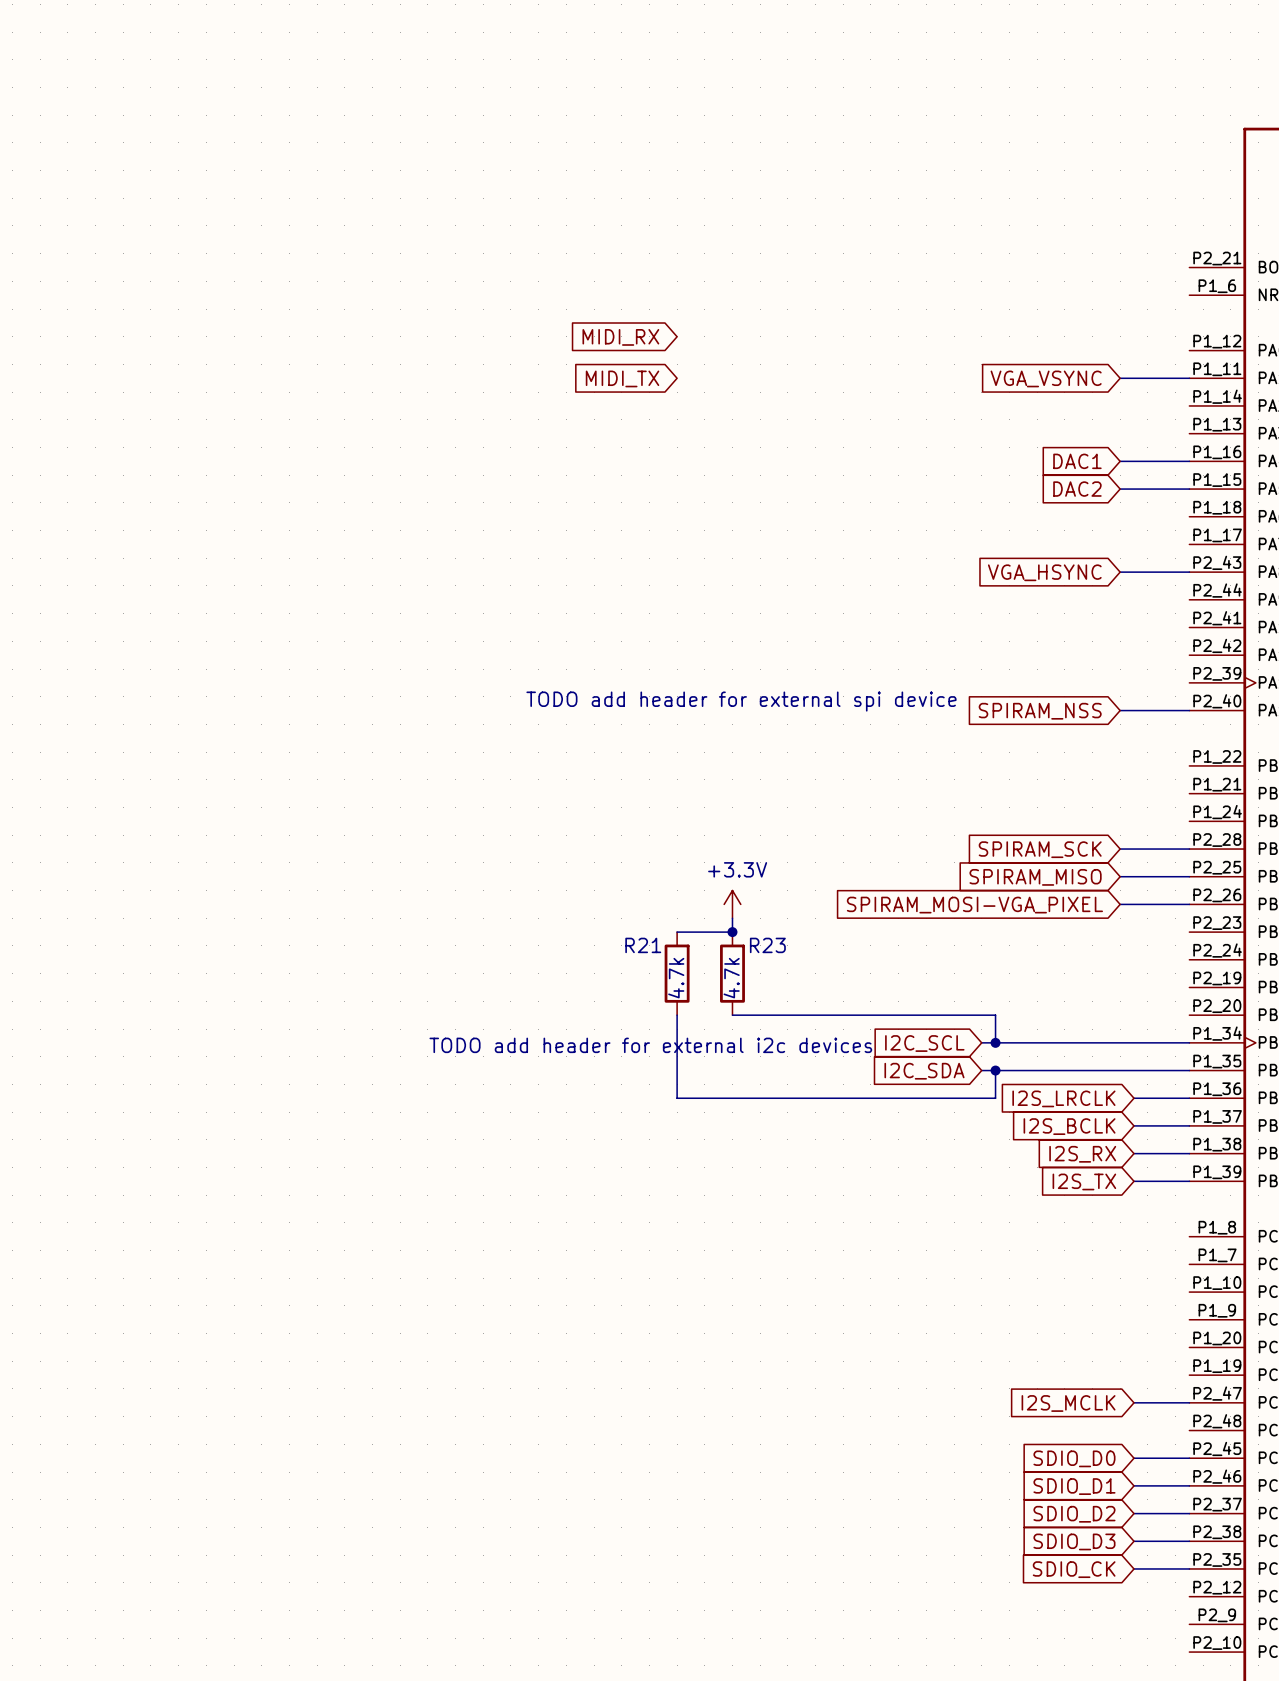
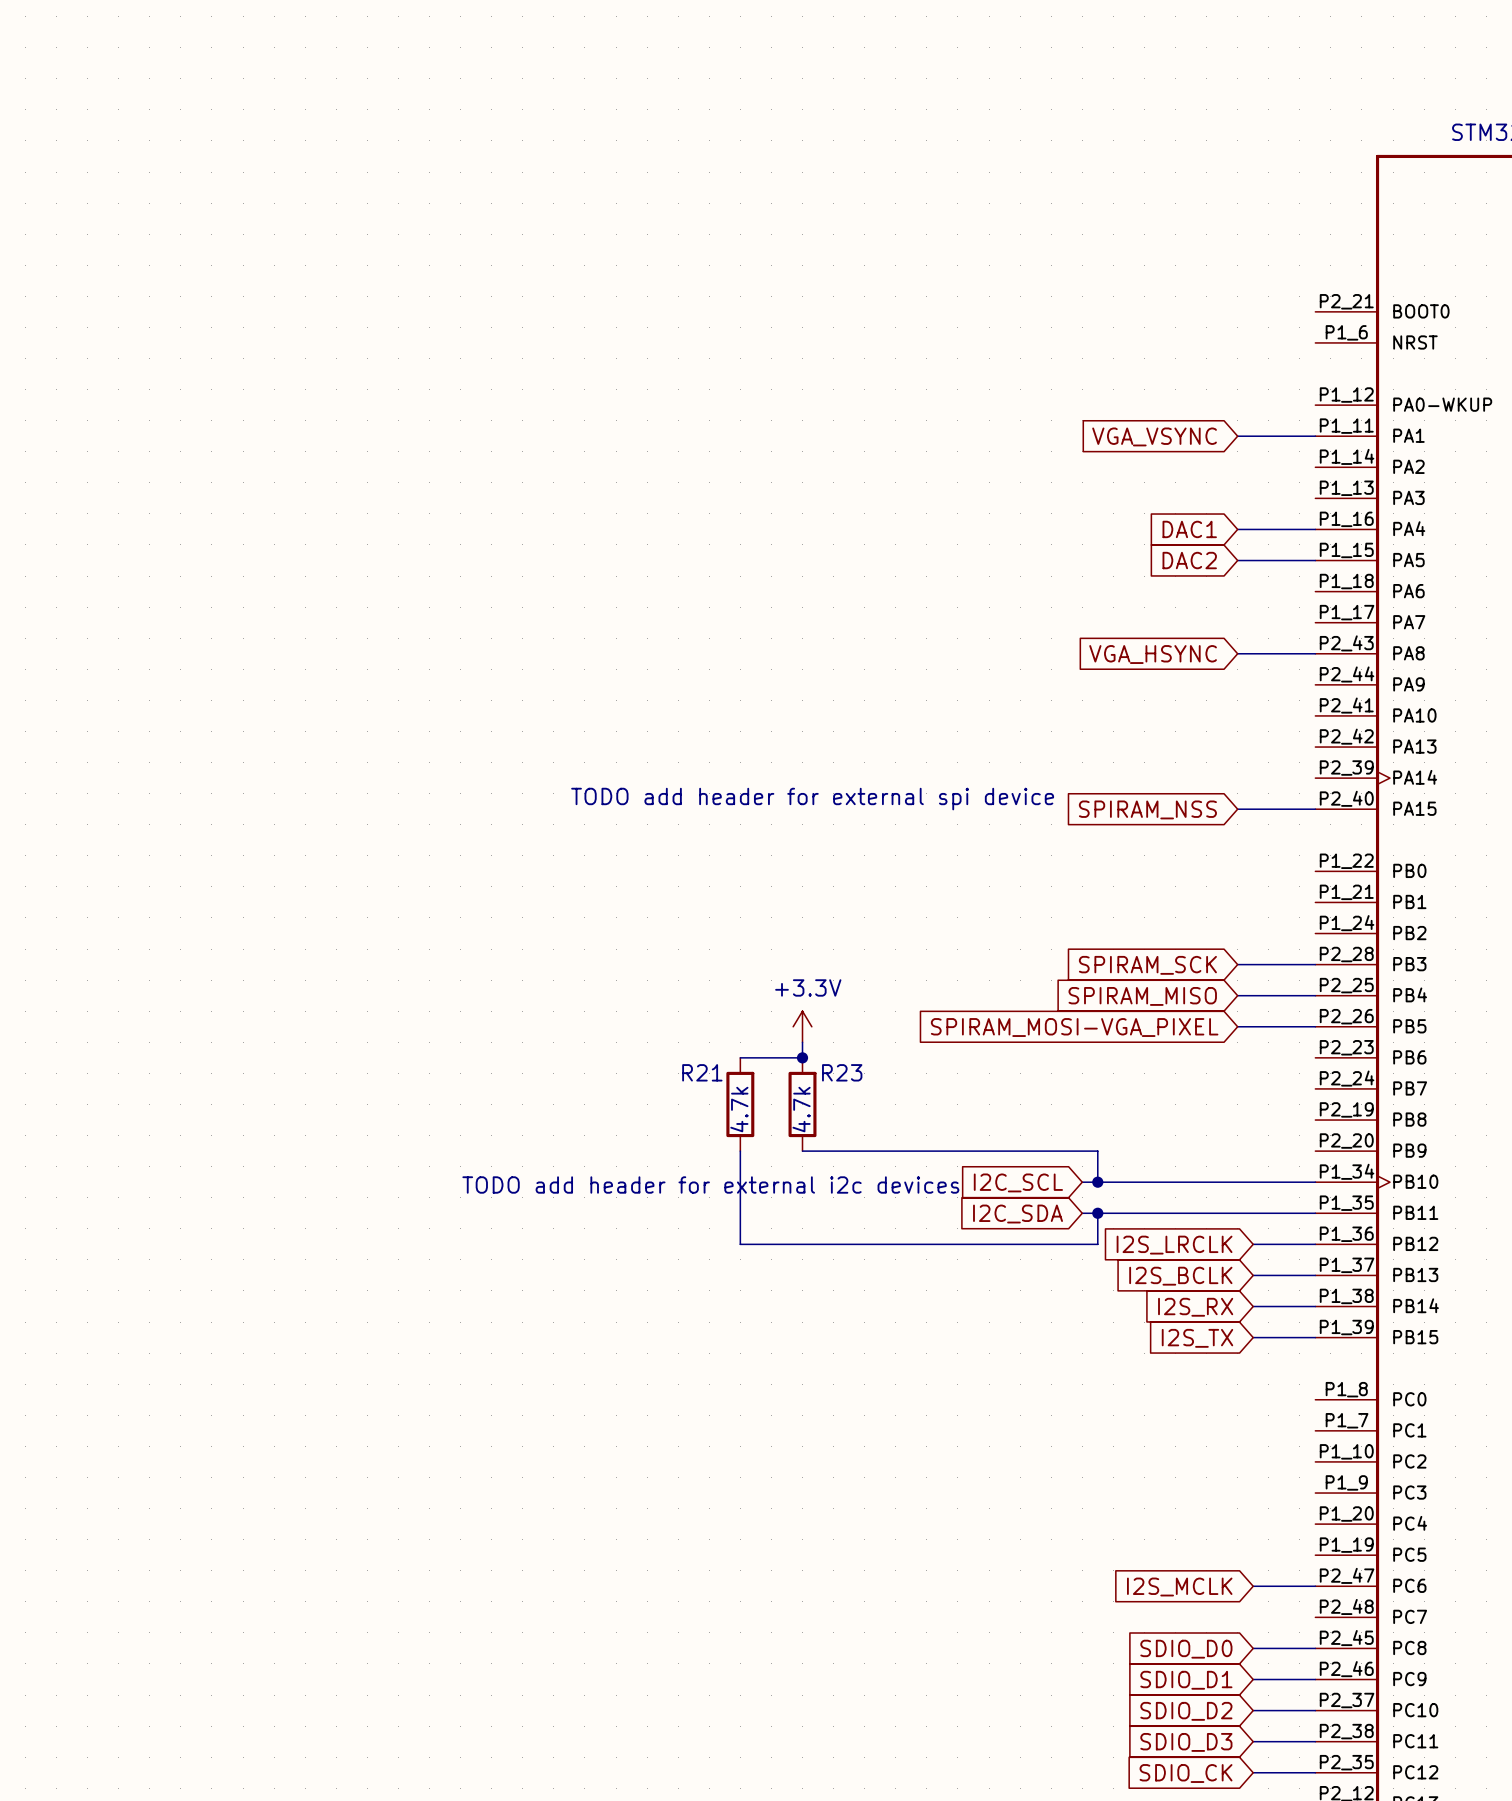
global label: MIDI_RX (620, 337) -> none
global label: MIDI_TX (622, 378) -> none

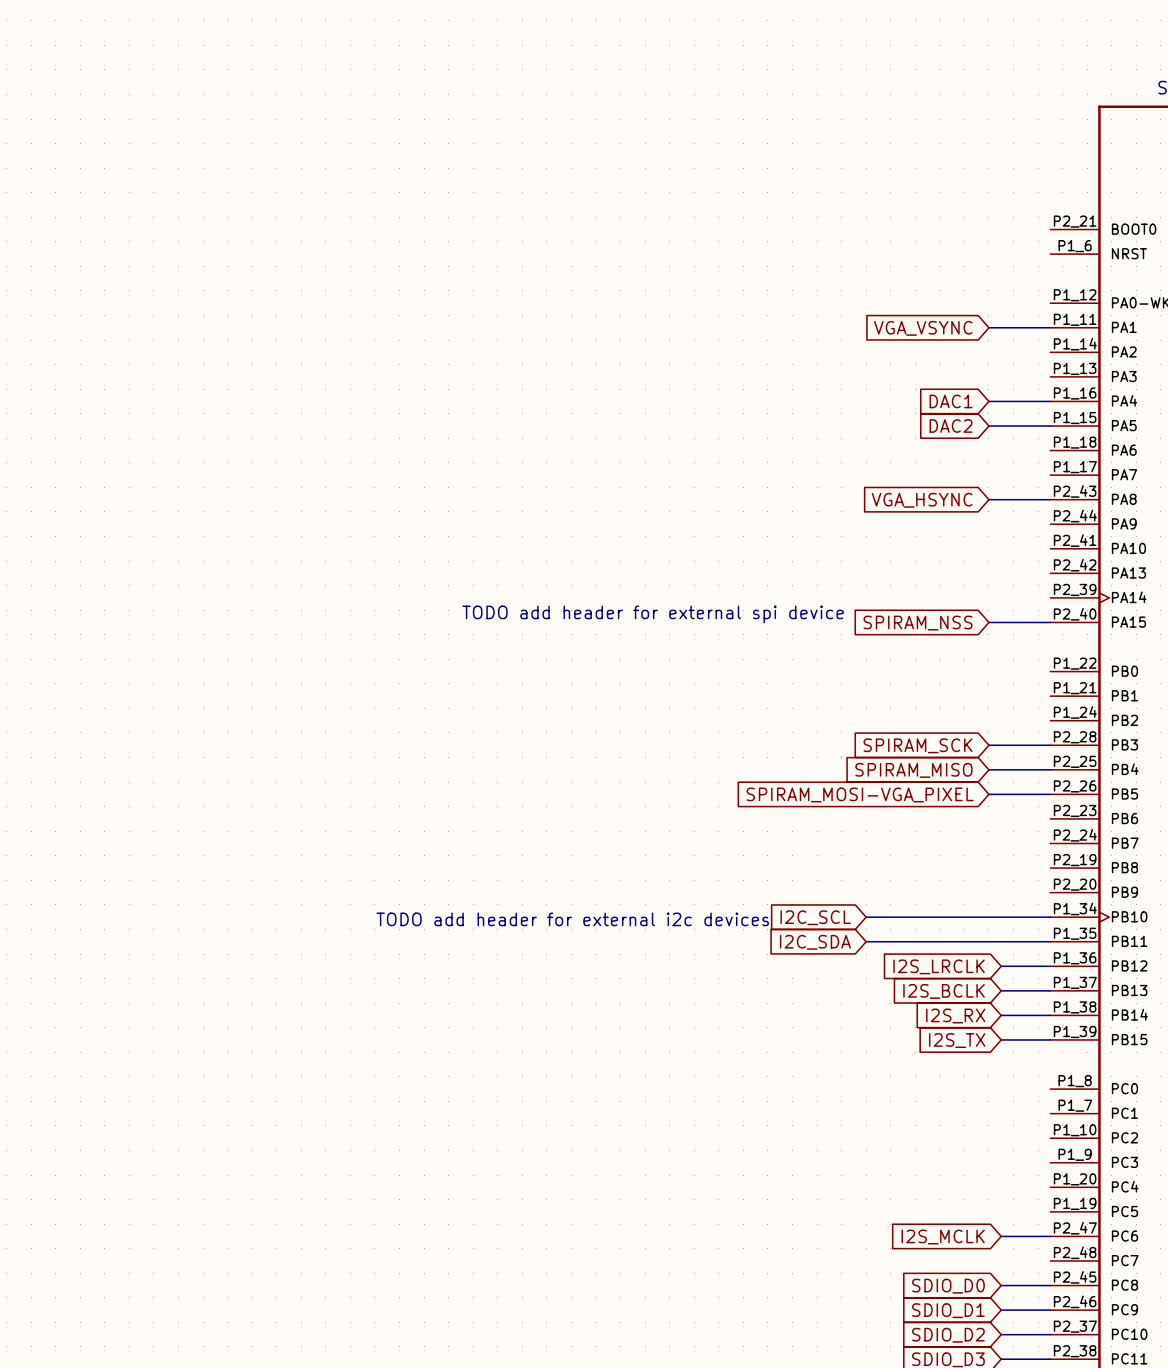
power symbol: +3.3V (802, 1026) -> none
wire: (802, 1042) (802, 1057) (740, 1057) -> none
junction: (802, 1057) -> none
R21: 4.7k (740, 1104) -> none
R23: 4.7k (802, 1104) -> none
wire: (740, 1151) (740, 1244) (1097, 1244) (1097, 1213) -> none
wire: (802, 1151) (1097, 1151) (1097, 1182) -> none
junction: (1097, 1182) -> none
junction: (1097, 1213) -> none

